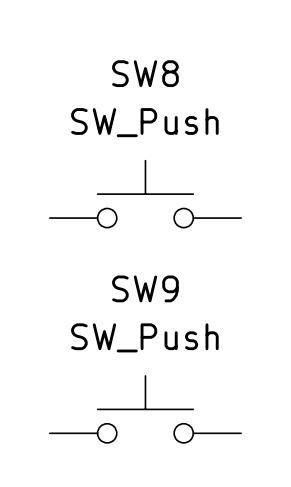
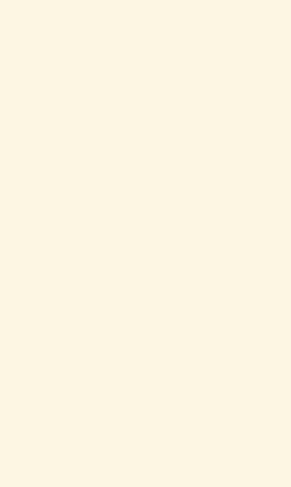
SW8: SW_Push (145, 194) -> none
SW9: SW_Push (145, 409) -> none

